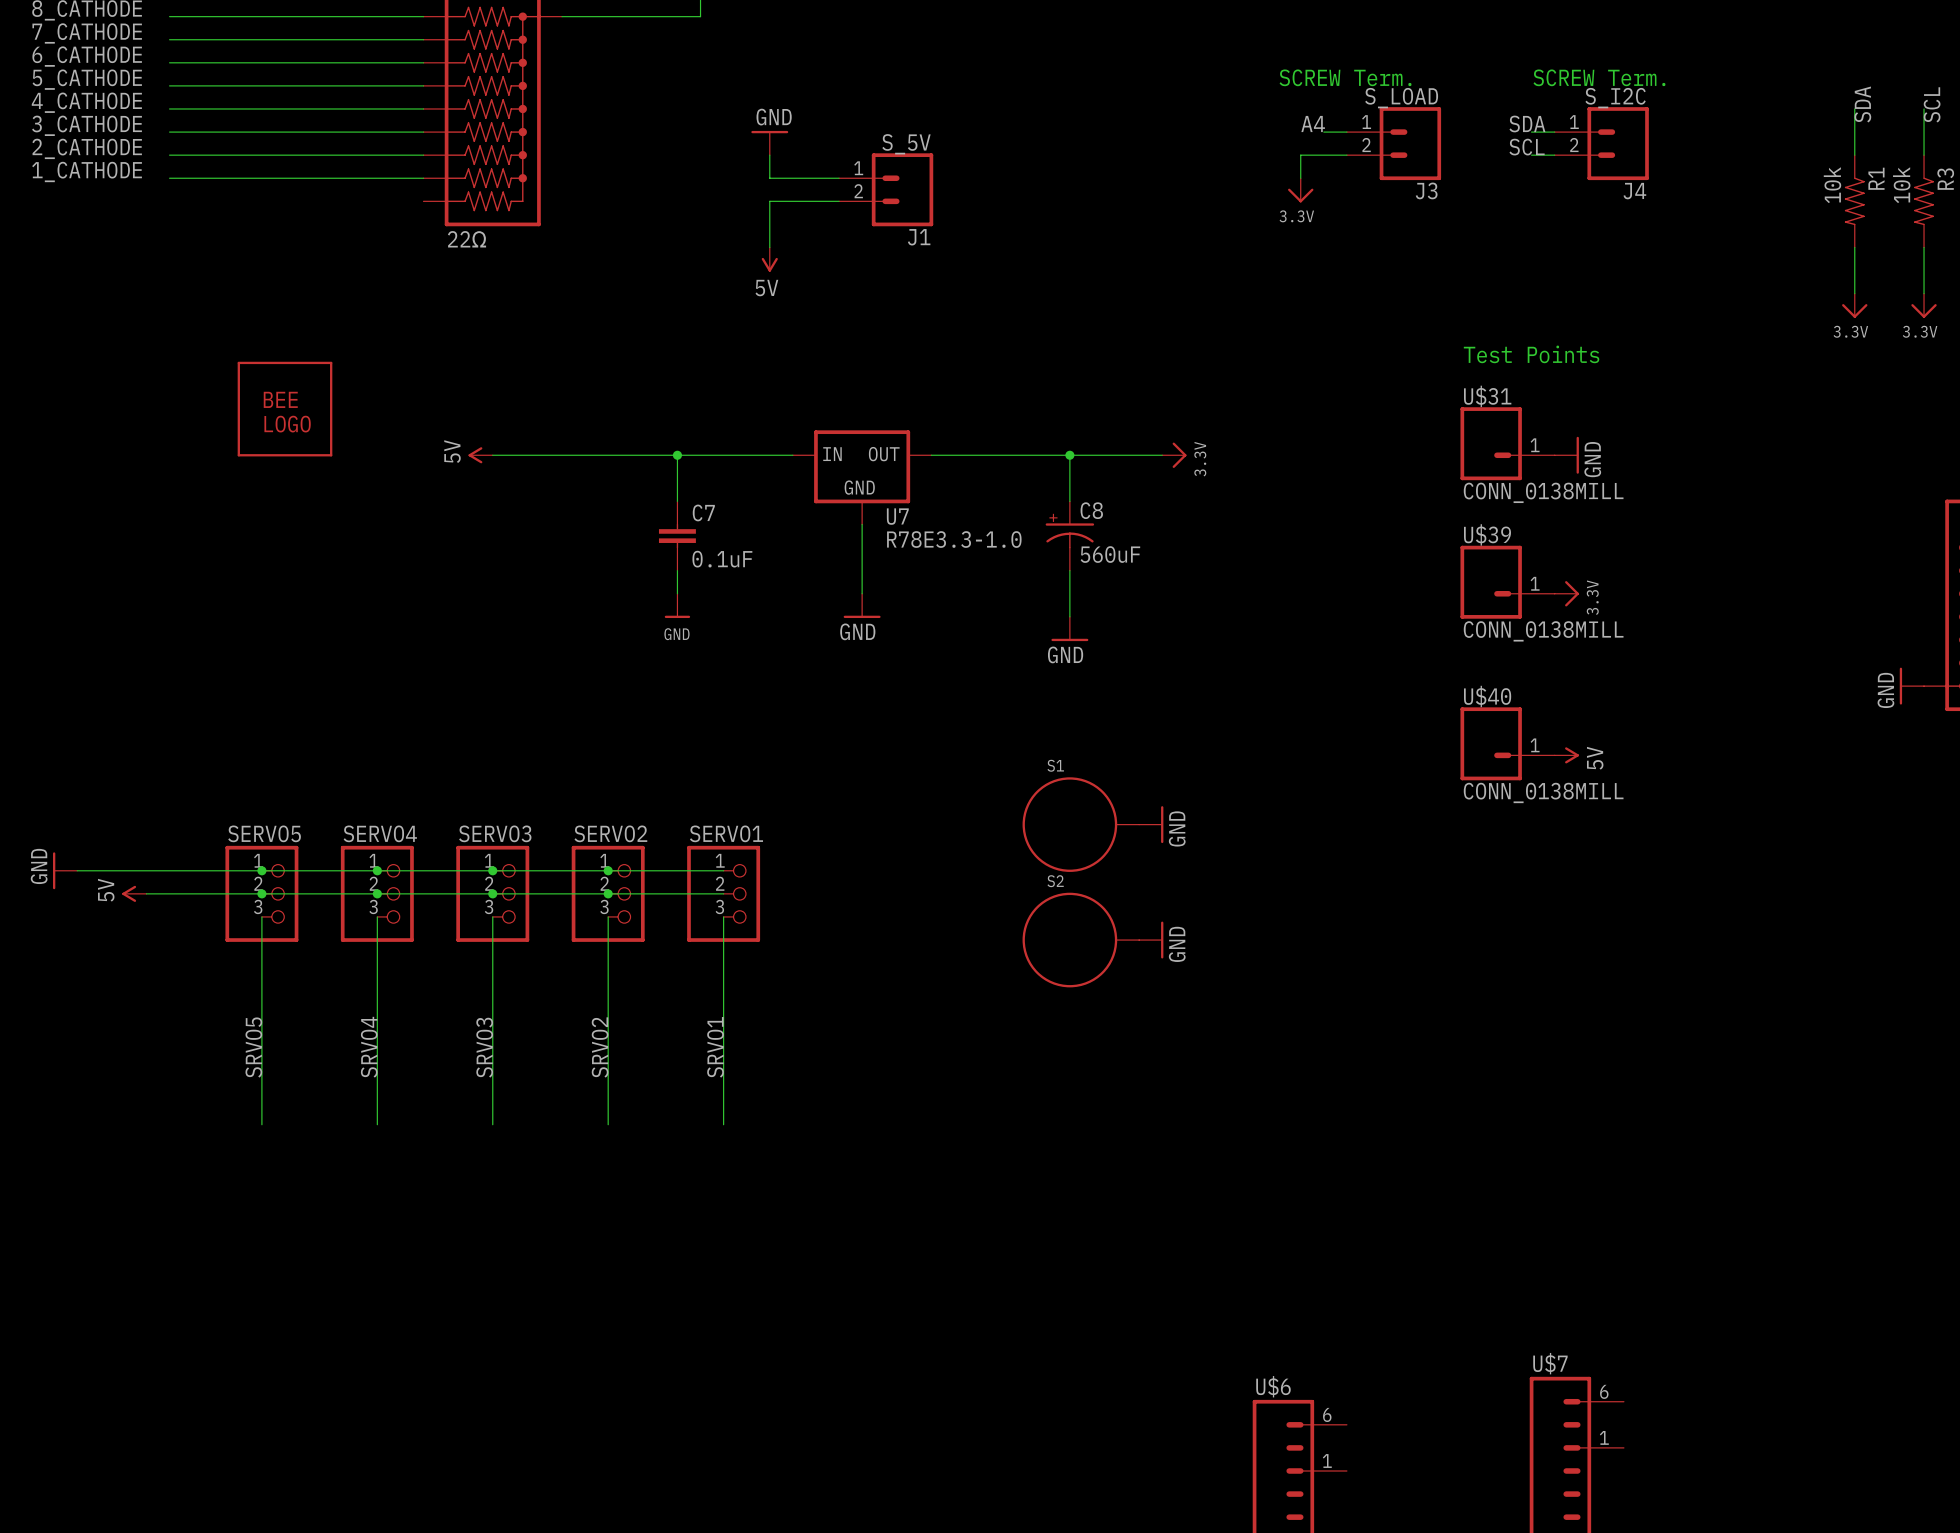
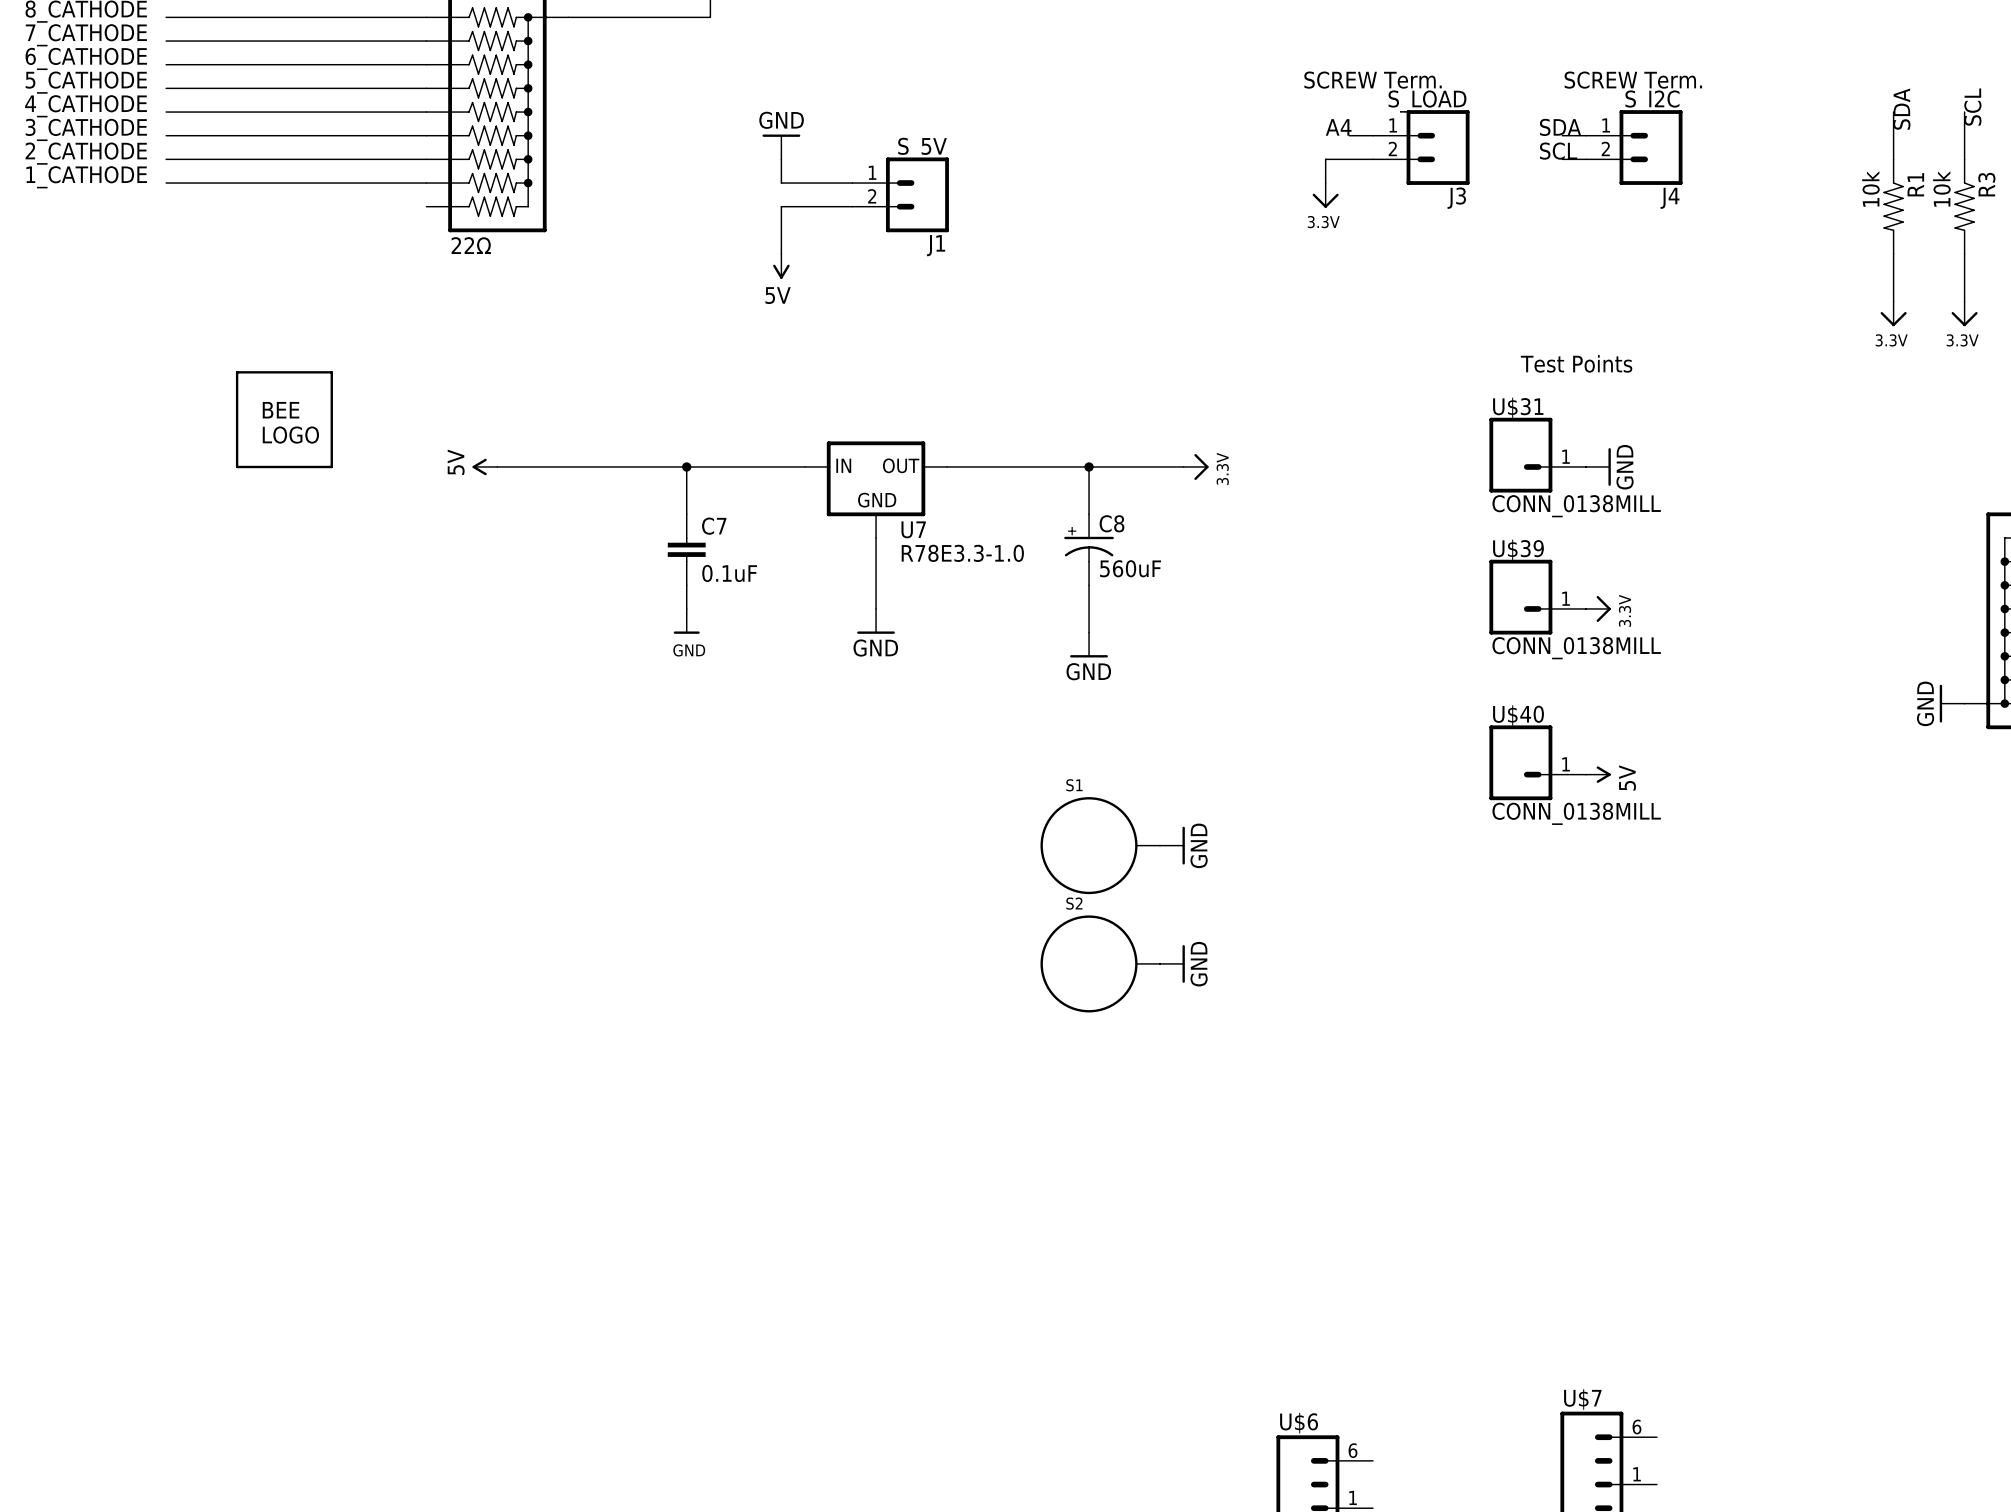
power symbol: GND (65, 870) -> none
wire: (77, 870) (723, 870) -> none
junction: (261, 870) -> none
junction: (377, 870) -> none
junction: (492, 870) -> none
junction: (608, 870) -> none
power symbol: 5V (134, 893) -> none
wire: (146, 893) (723, 893) -> none
SERVO5: (261, 893) -> none
junction: (261, 893) -> none
SERVO4: (377, 893) -> none
junction: (377, 893) -> none
SERVO3: (492, 893) -> none
junction: (492, 893) -> none
SERVO2: (608, 893) -> none
junction: (608, 893) -> none
SERVO1: (723, 893) -> none
wire: (261, 916) (261, 1124) -> none
wire: (377, 916) (377, 1124) -> none
wire: (492, 916) (492, 1124) -> none
wire: (608, 916) (608, 1124) -> none
wire: (723, 916) (723, 1124) -> none
label: SRVO5 (253, 1047) -> none
label: SRVO4 (369, 1047) -> none
label: SRVO3 (484, 1047) -> none
label: SRVO2 (600, 1047) -> none
label: SRVO1 (715, 1047) -> none

